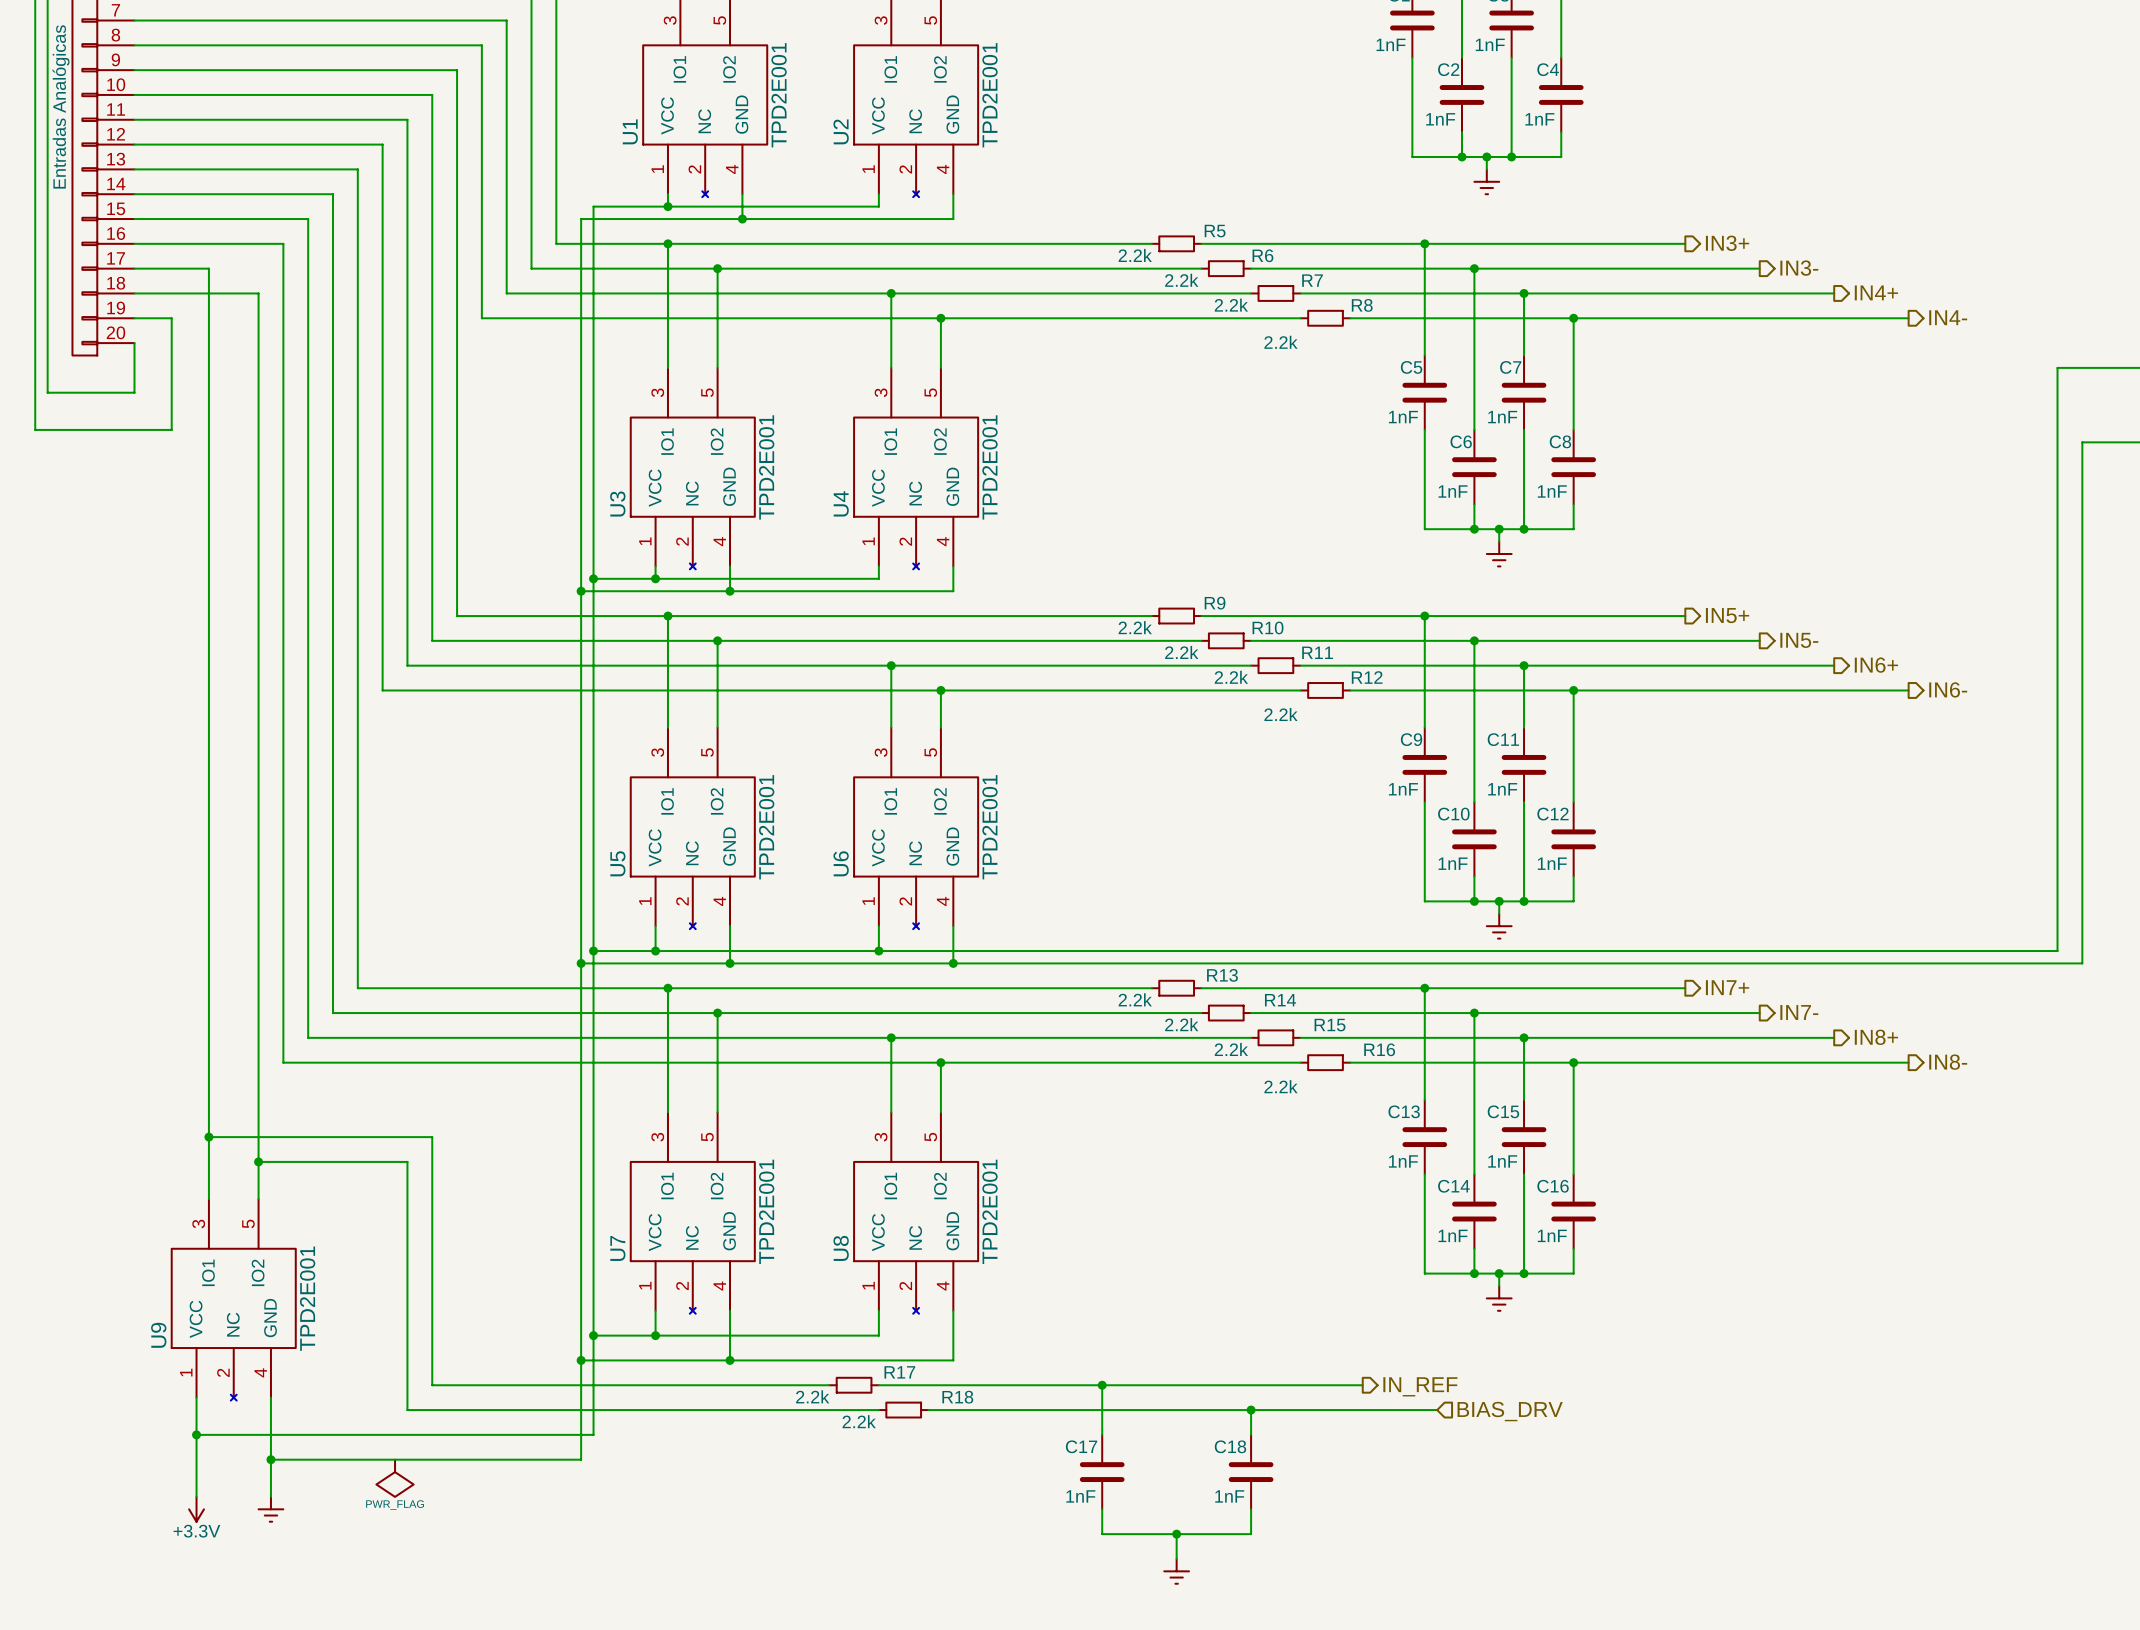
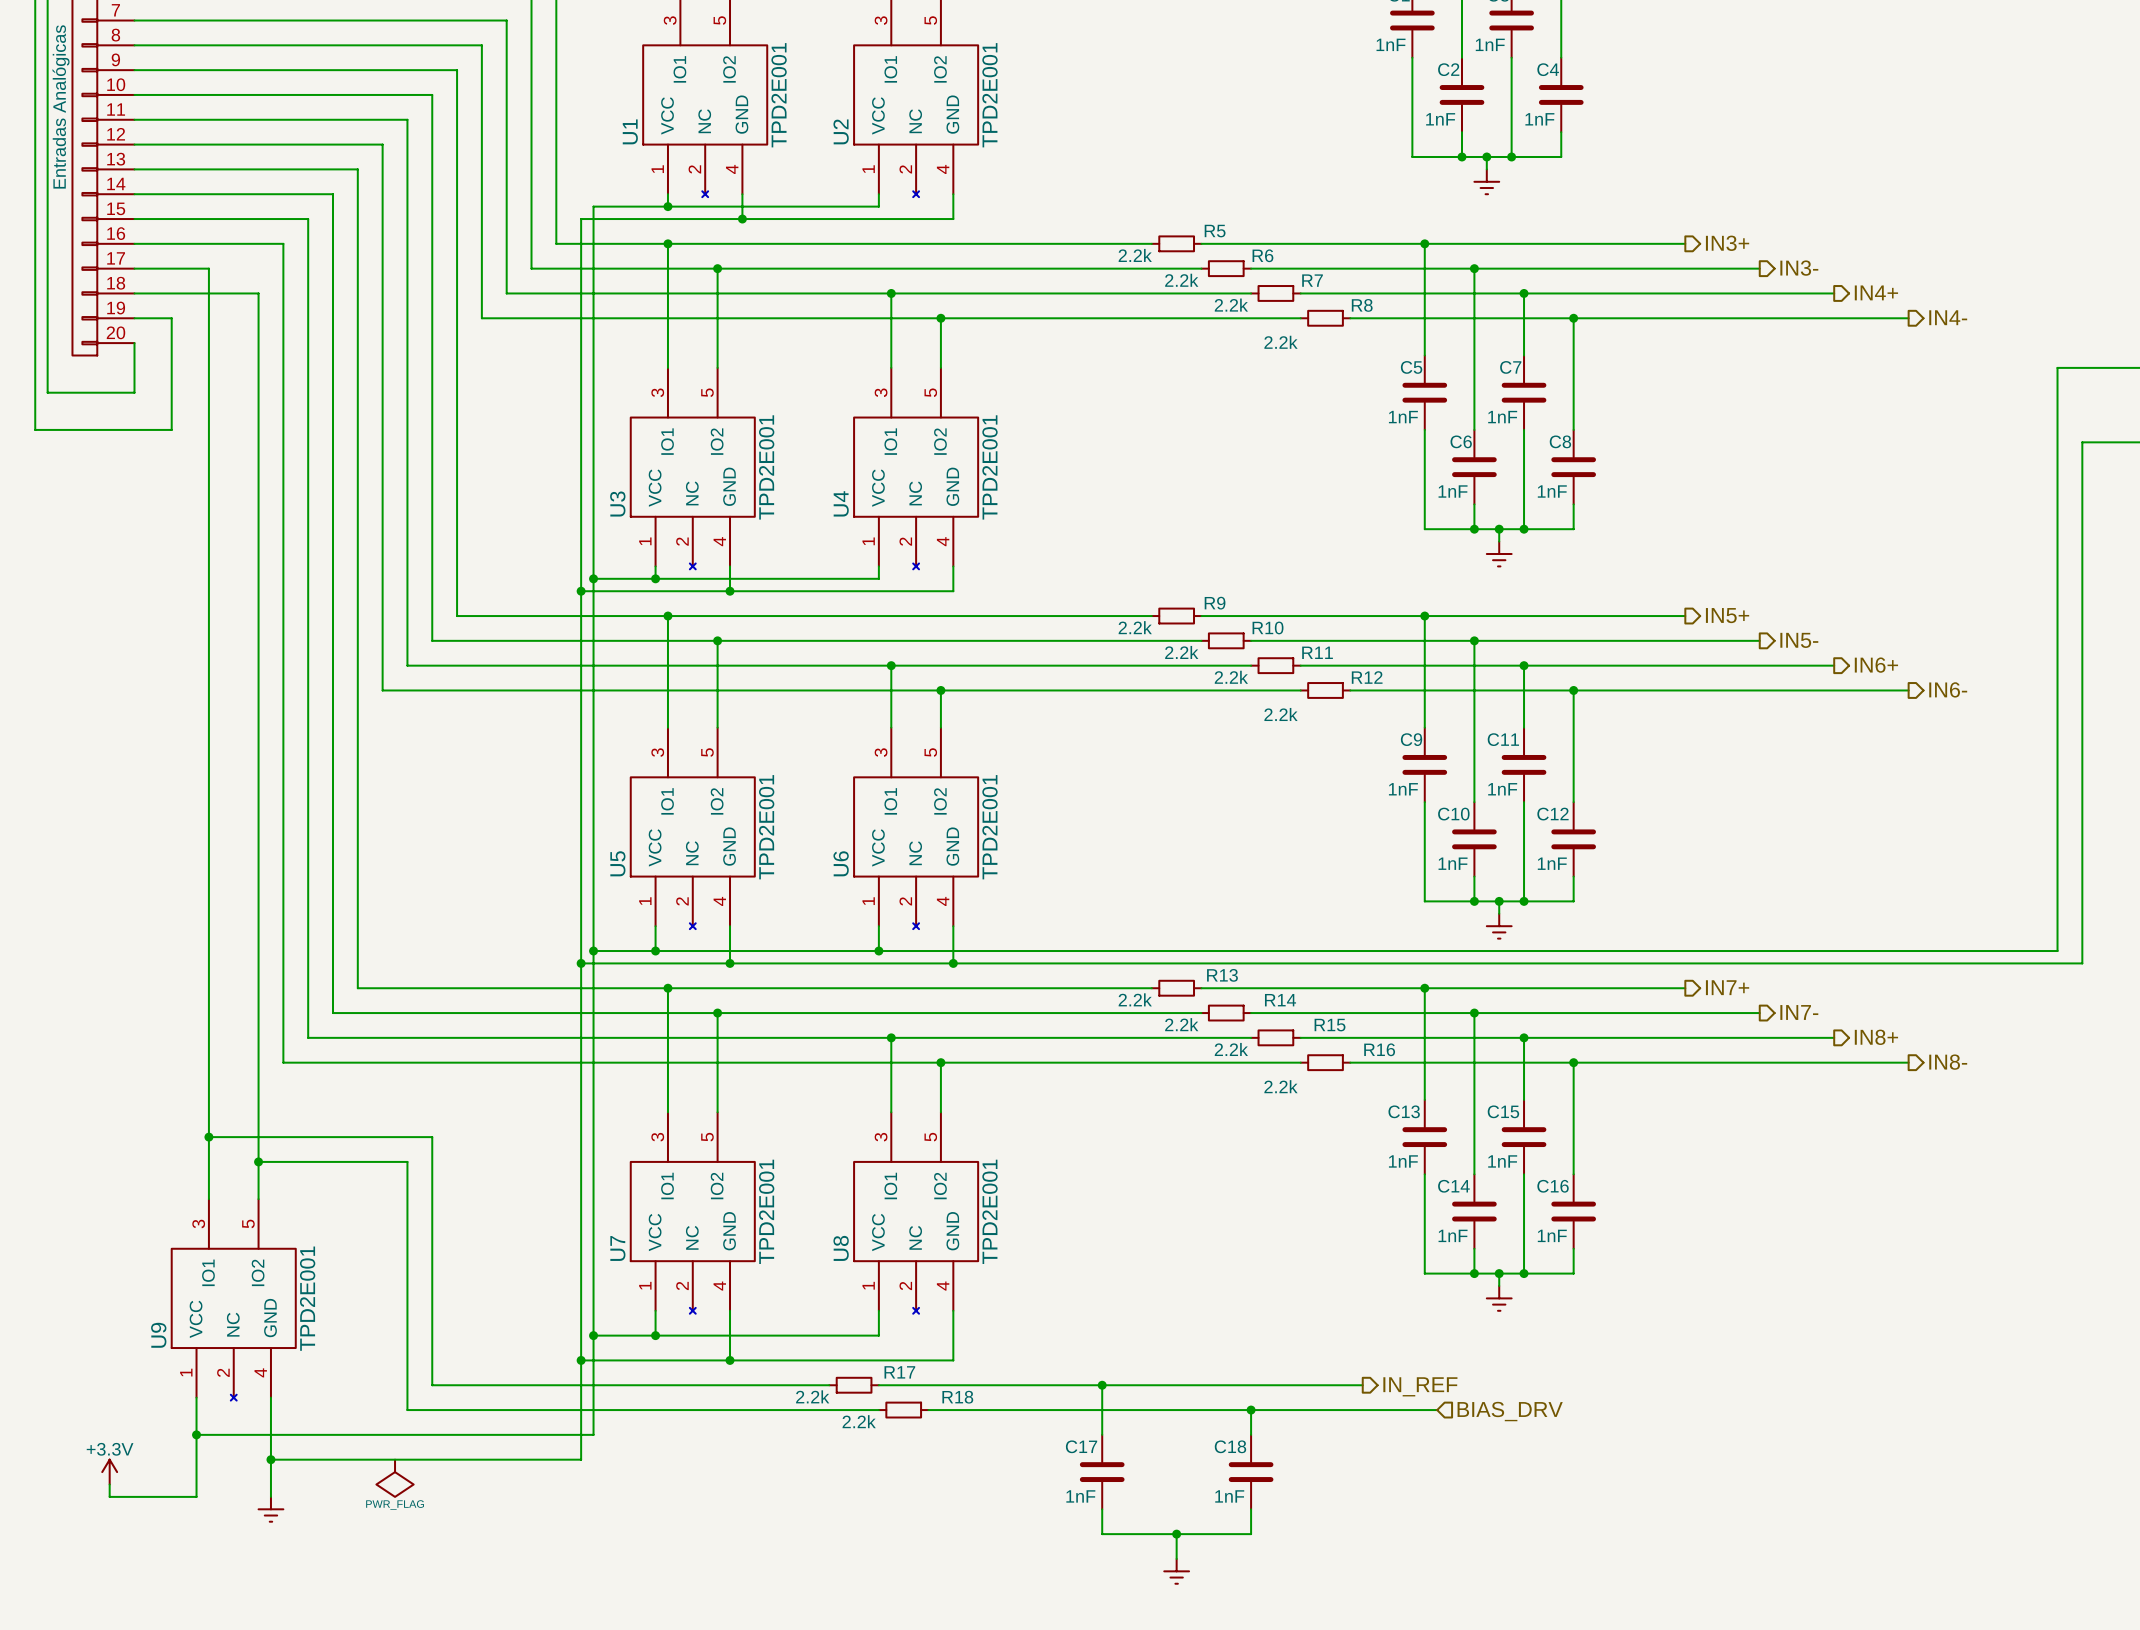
wire: none -> (109, 1484) (109, 1496) (196, 1496)
power symbol rotation: 0° (196, 1509) -> 180° (109, 1472)
power symbol position: +3.3V (196, 1509) -> +3.3V (109, 1472)

